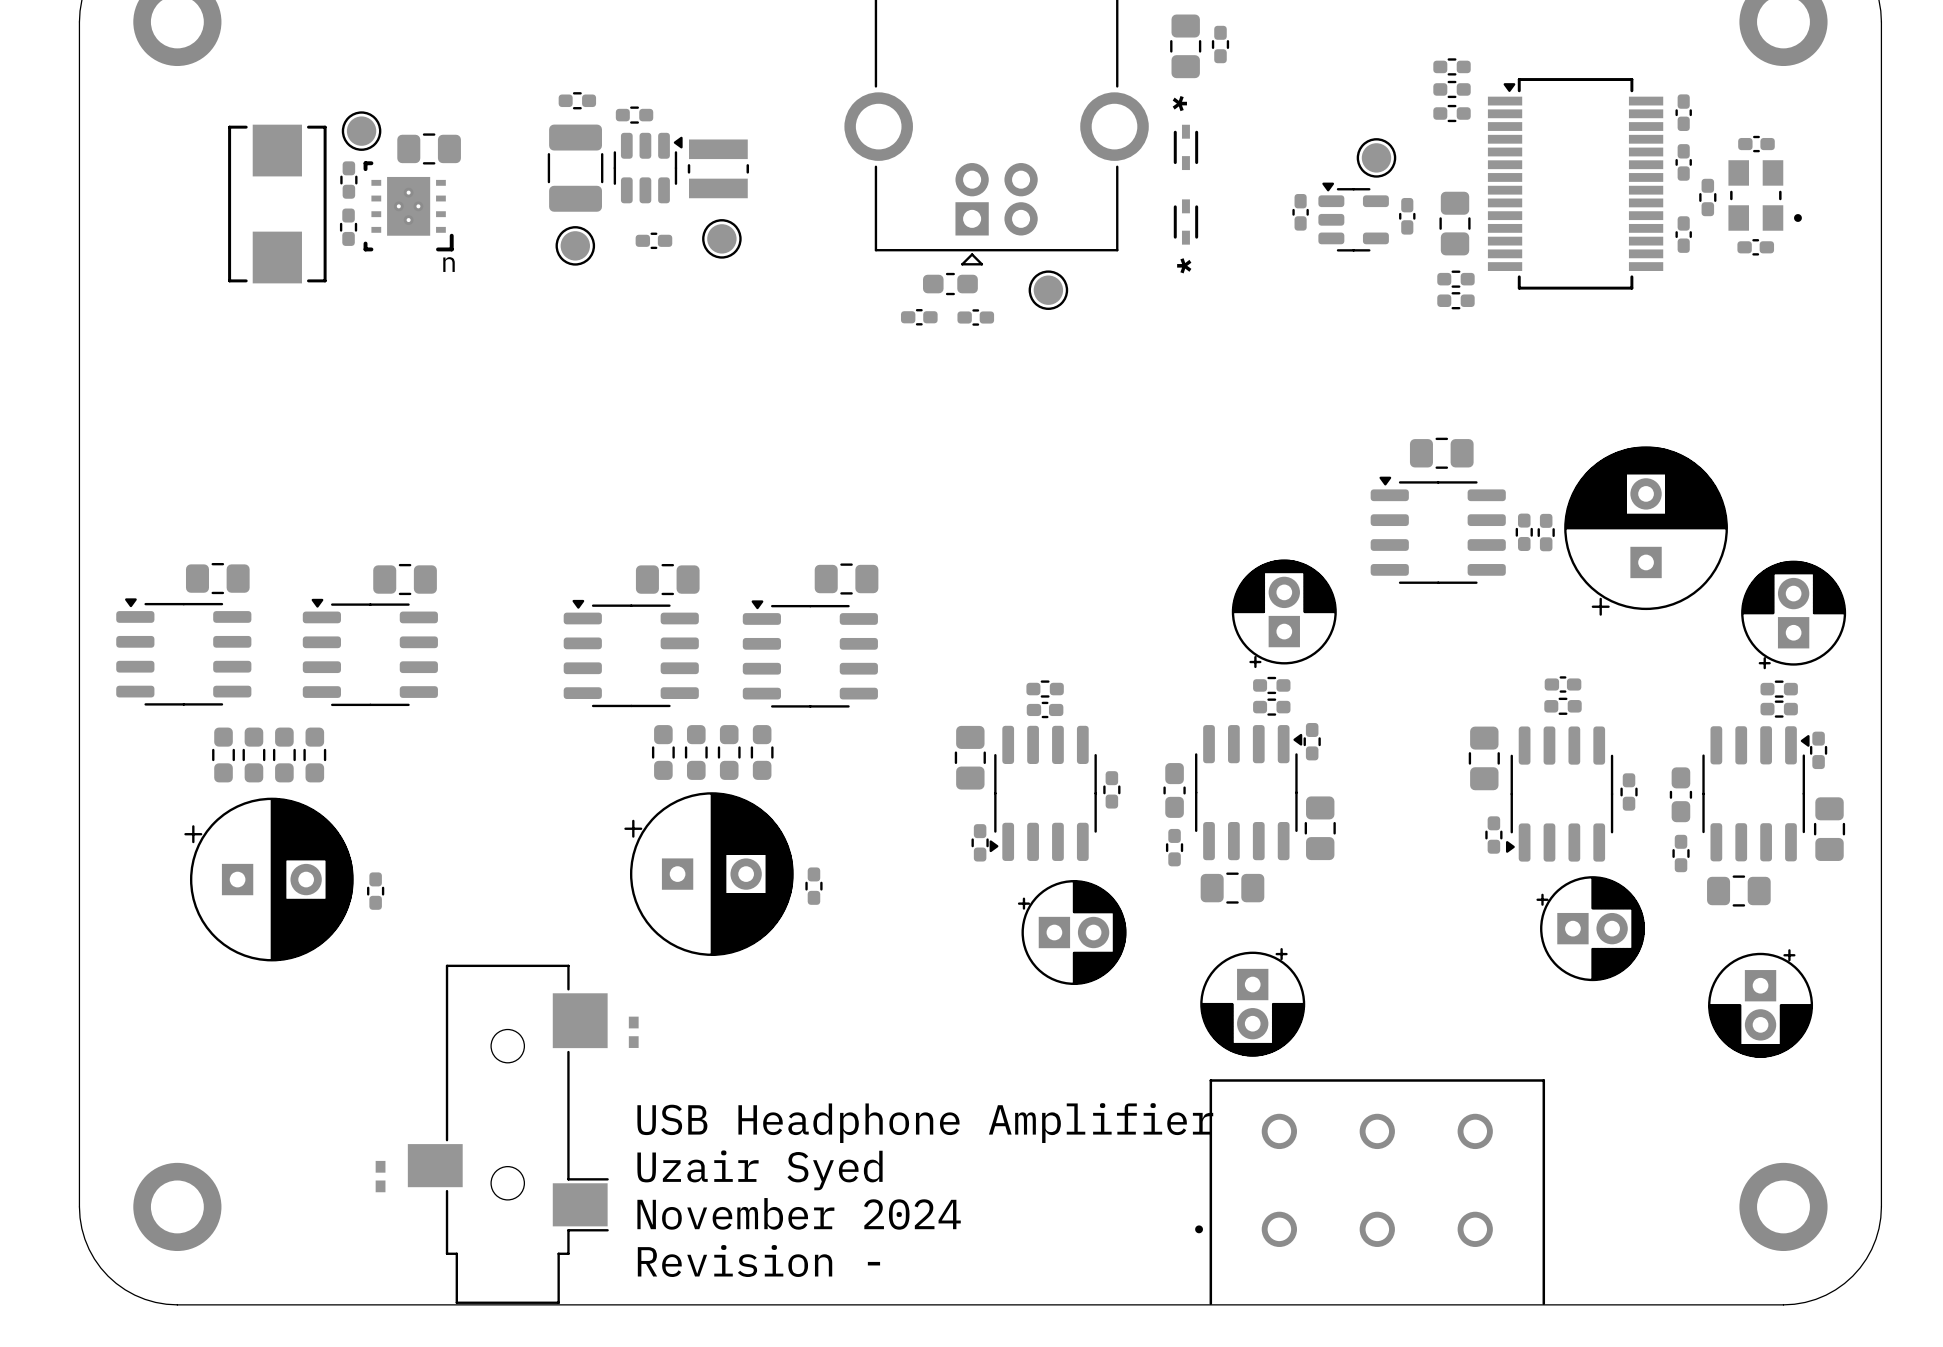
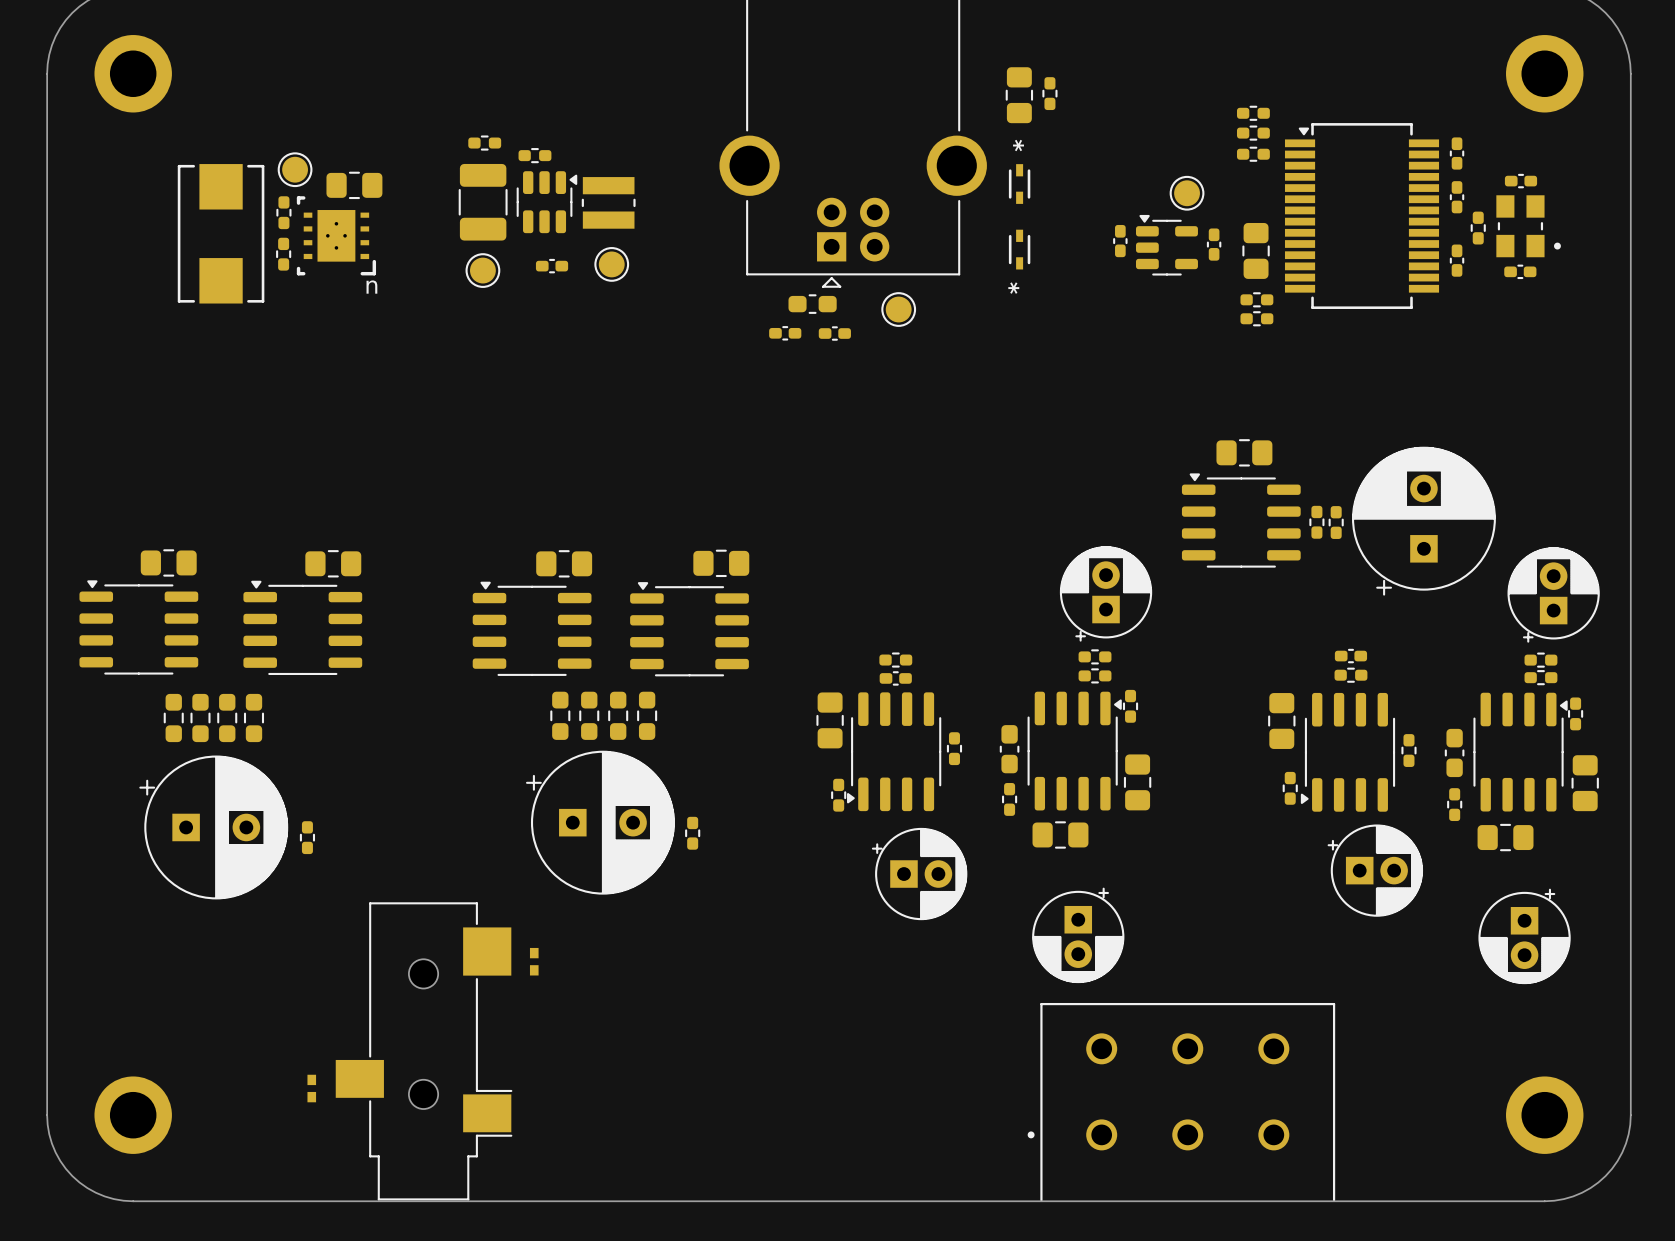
text: USB Headphone Amplifier (925, 1123) -> none
text: Uzair Syed (760, 1170) -> none
text: November 2024 (799, 1213) -> none
text: Revision - (758, 1261) -> none

